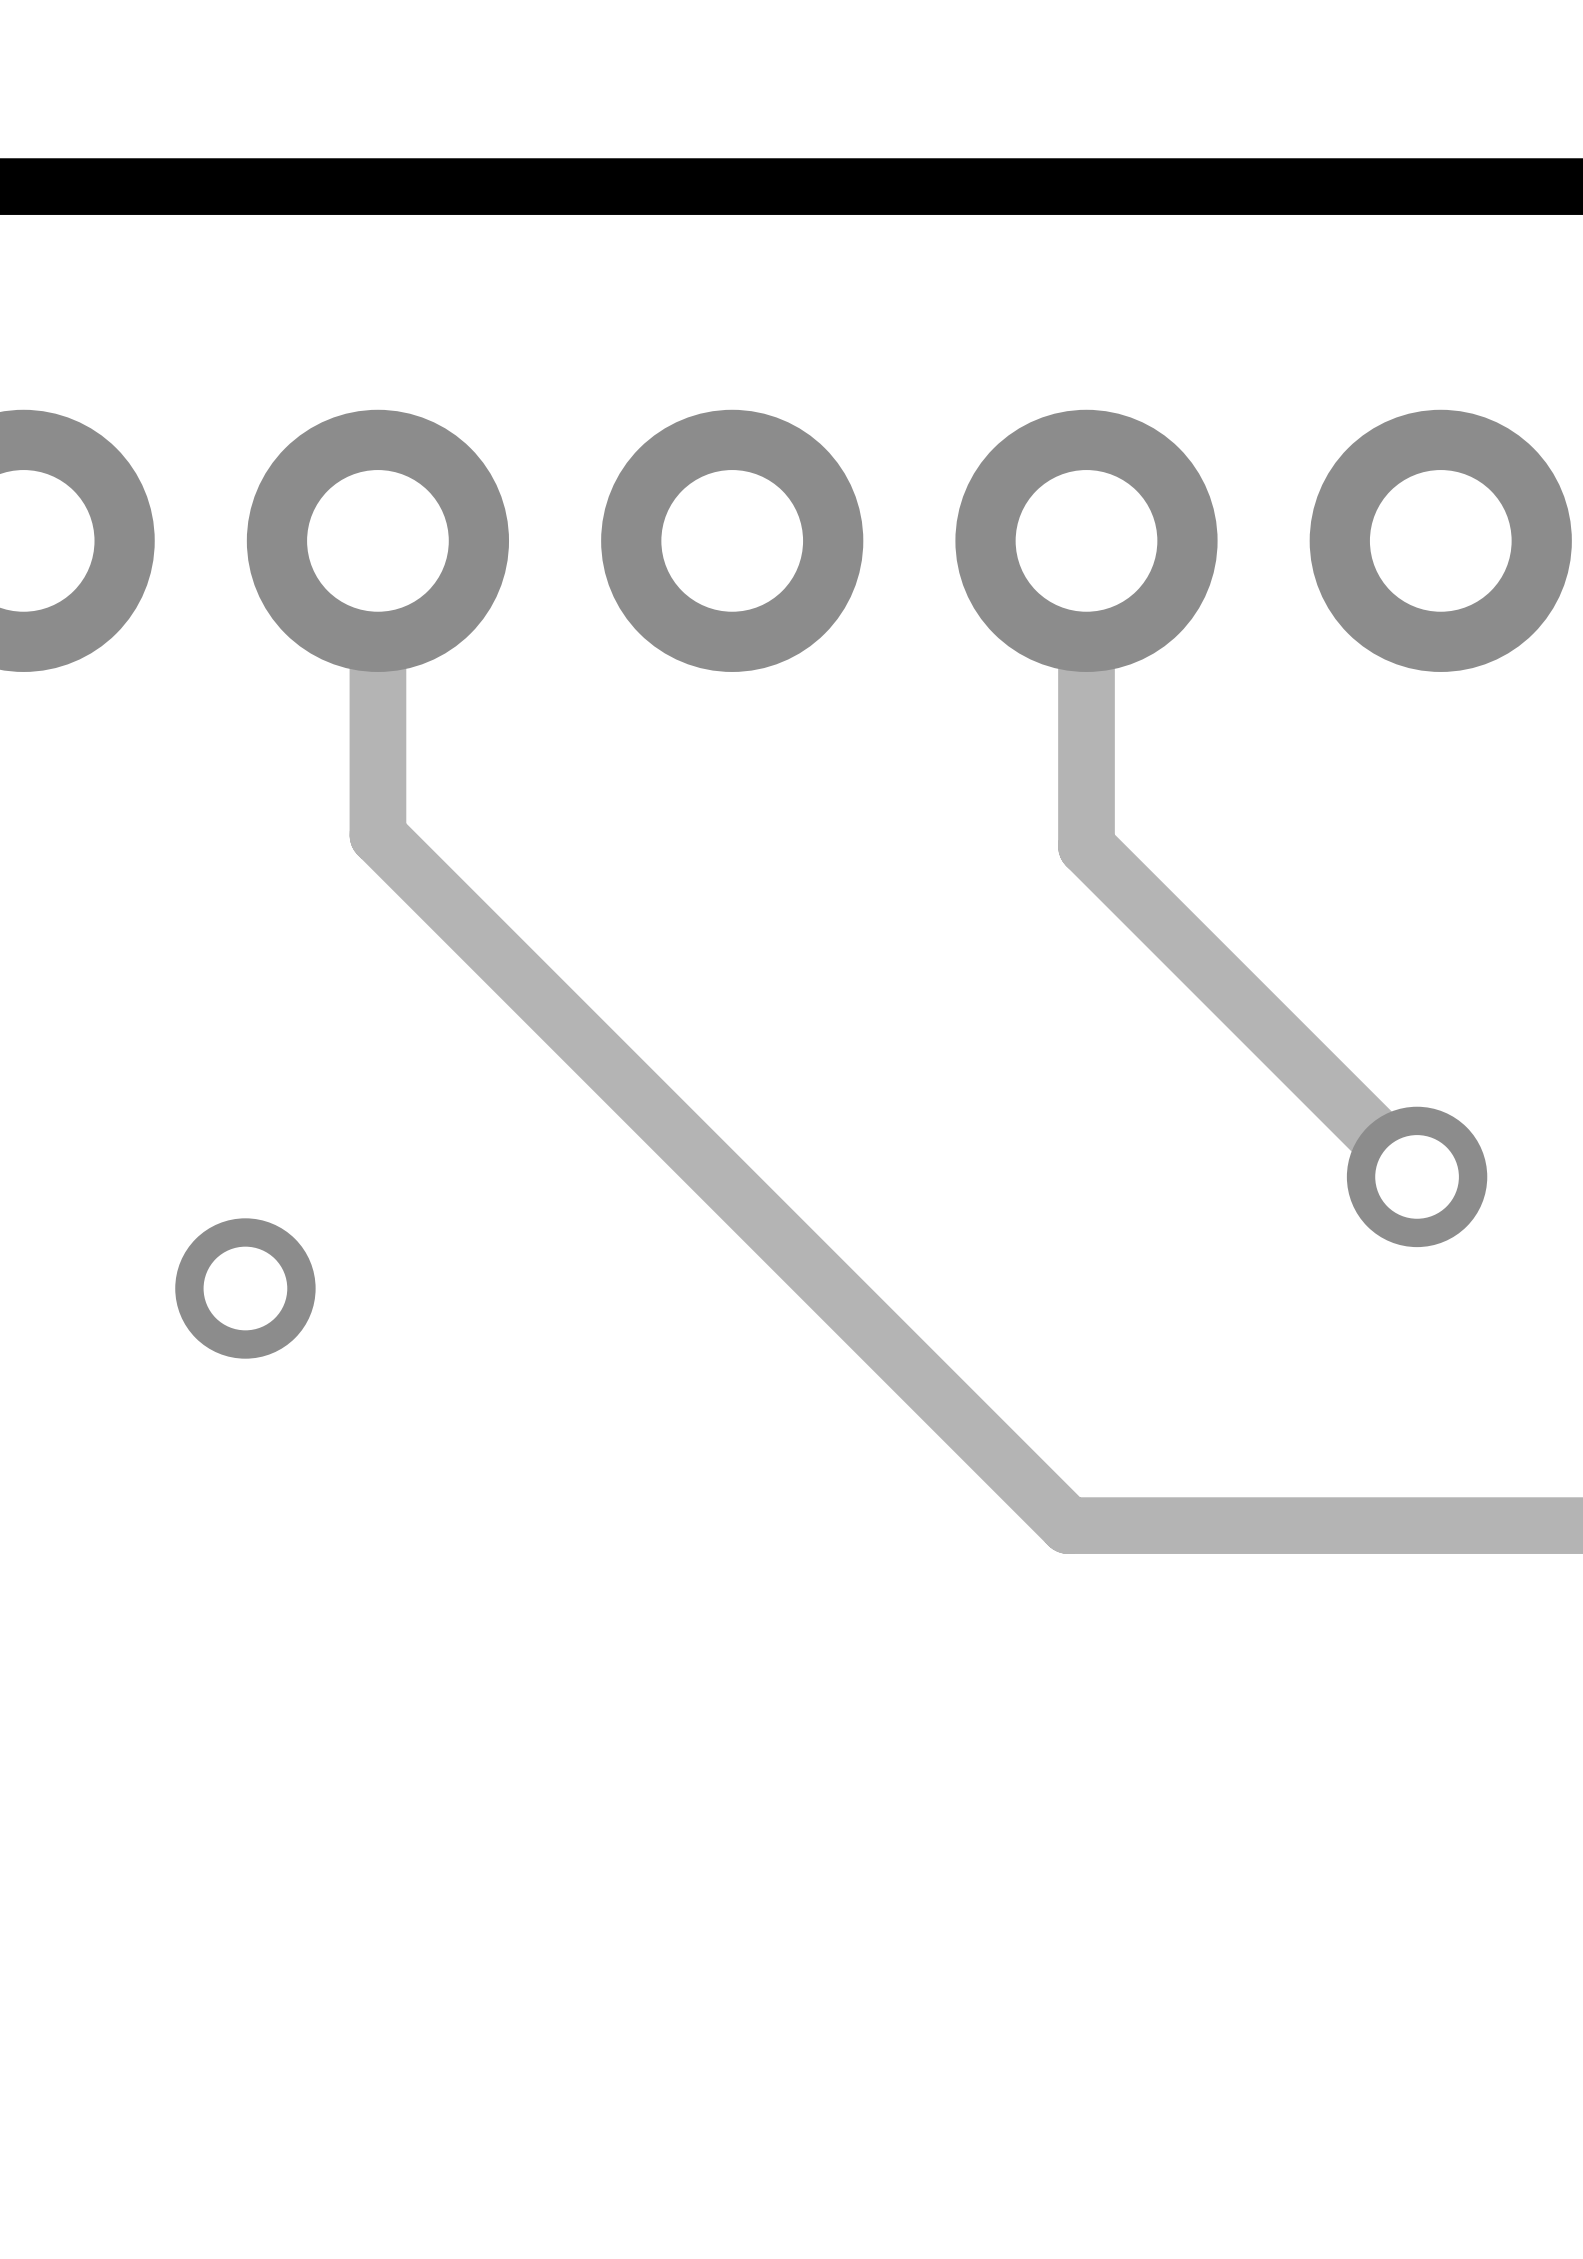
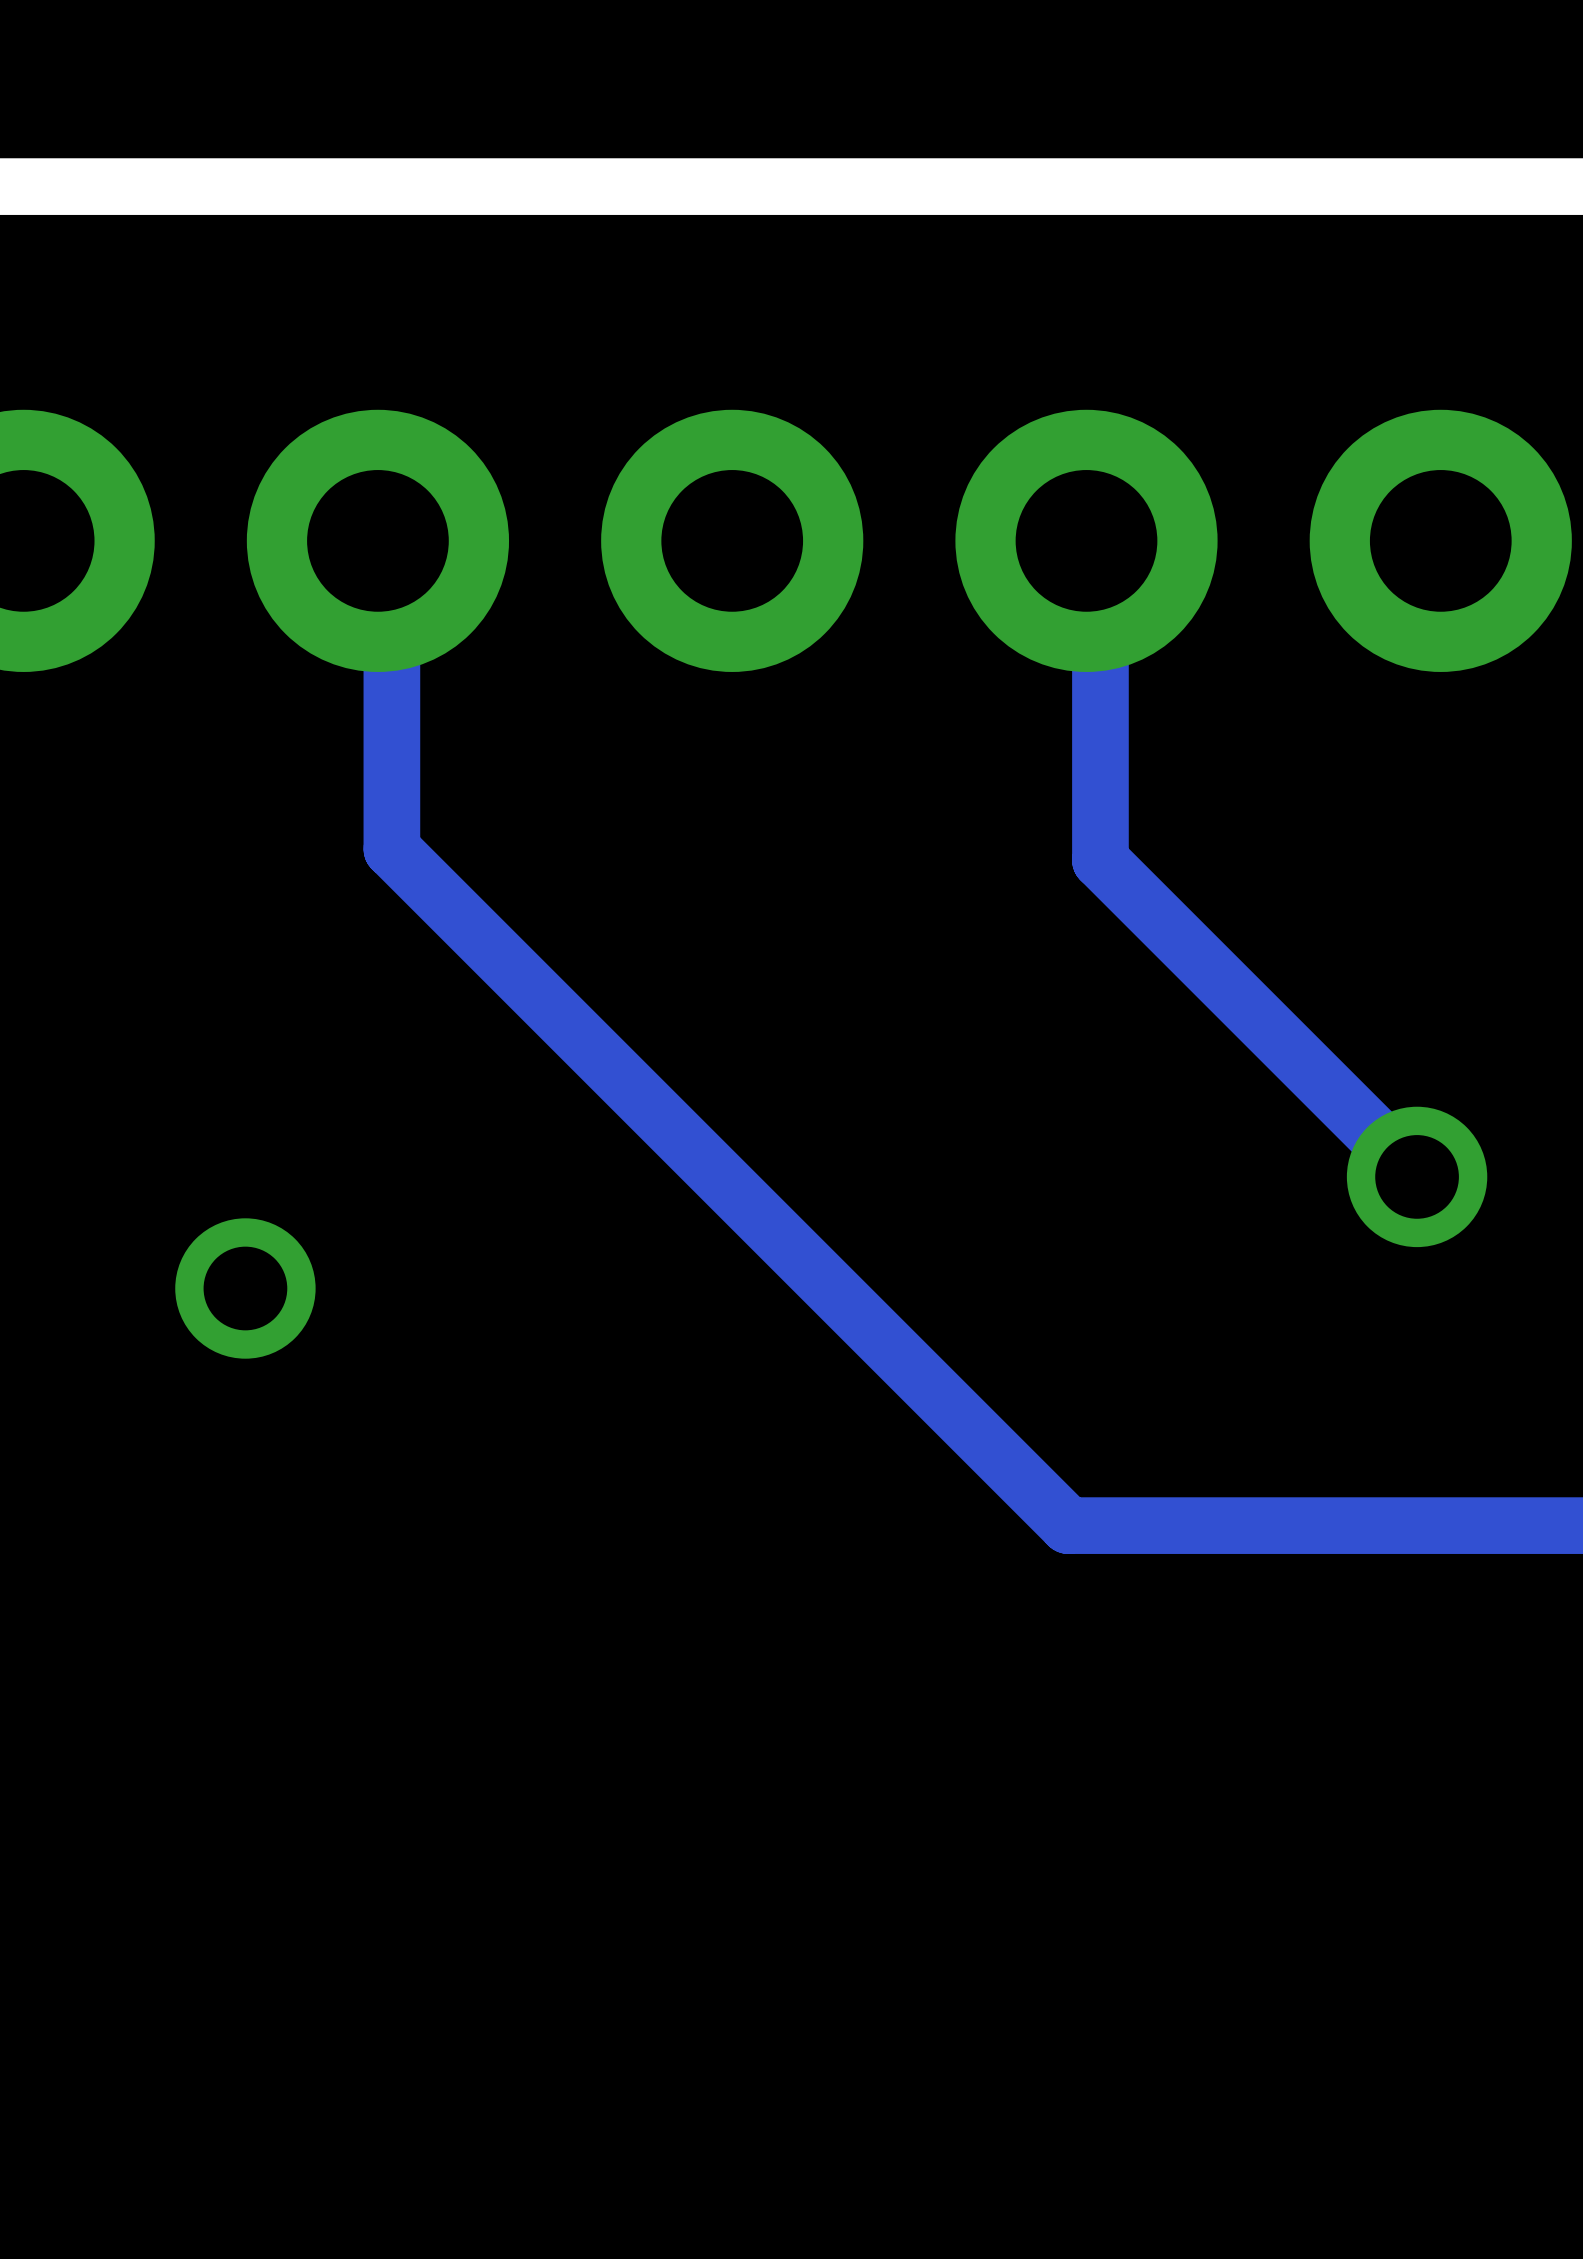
track: (377, 540) (377, 835) (391, 849) -> (391, 538) (391, 849)
track: (1086, 540) (1086, 846) (1100, 860) -> (1100, 538) (1100, 860)

